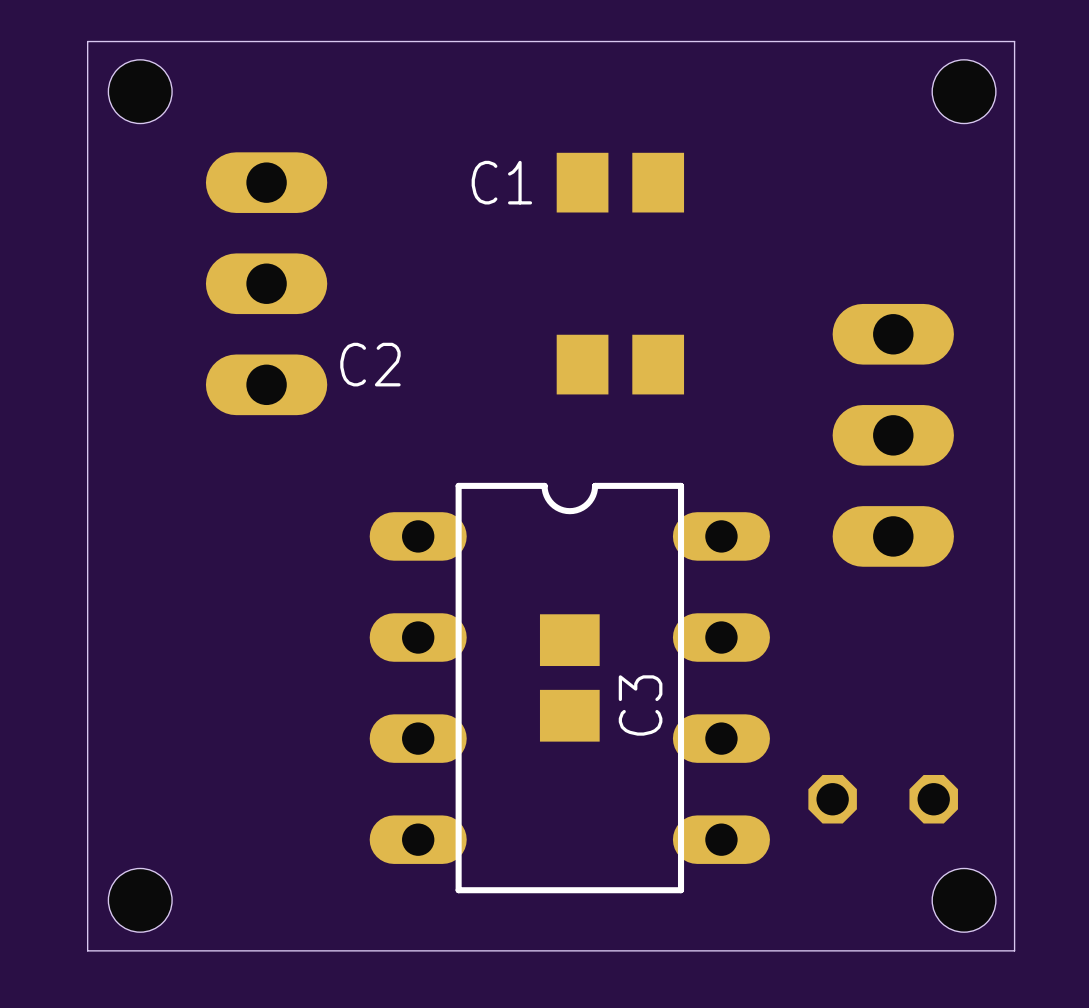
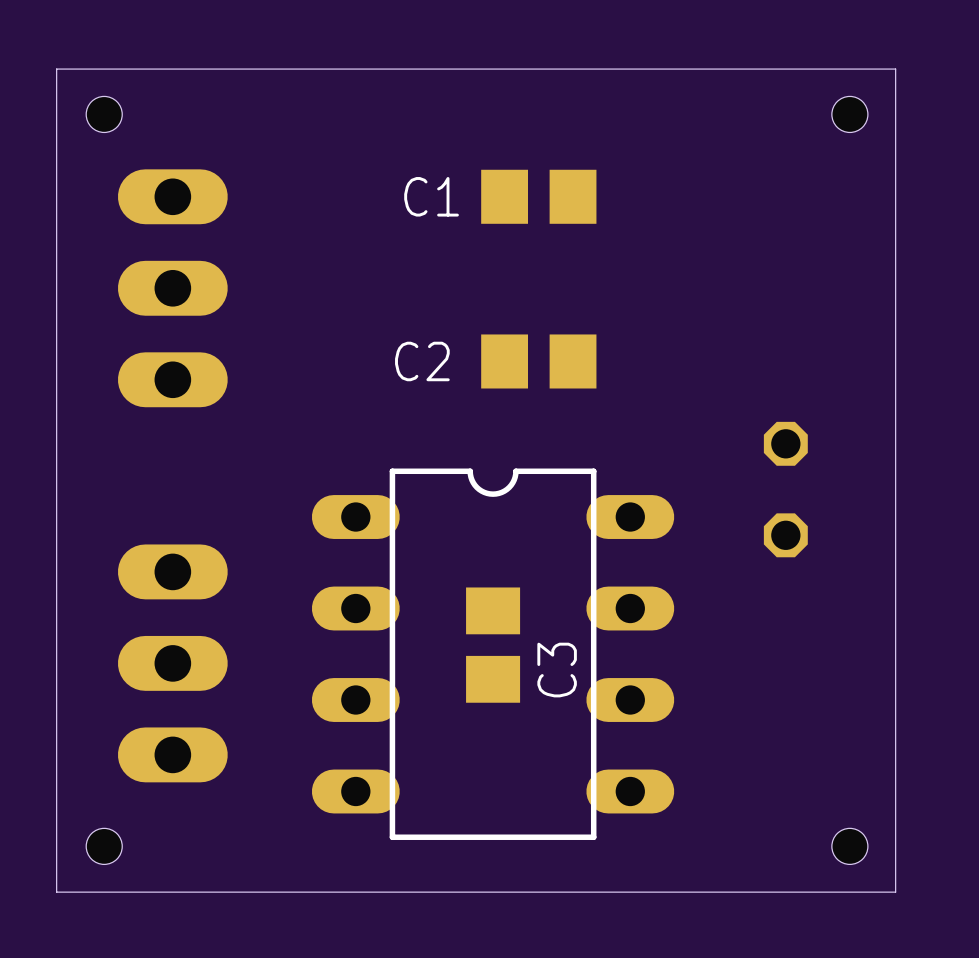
hole size: [108, 59, 173, 124] -> [86, 96, 123, 133]
hole size: [932, 59, 996, 124] -> [831, 96, 868, 133]
part position: (266, 283) -> (172, 288)
C2 name position: C2 (370, 364) -> C2 (422, 361)
part: (893, 435) -> none
part: none -> (172, 663)
part rotation: 0° (883, 799) -> 90° clockwise (785, 489)
part position: (883, 799) -> (785, 489)
hole size: [108, 868, 173, 933] -> [86, 828, 123, 865]
hole size: [932, 868, 996, 933] -> [831, 828, 868, 865]

